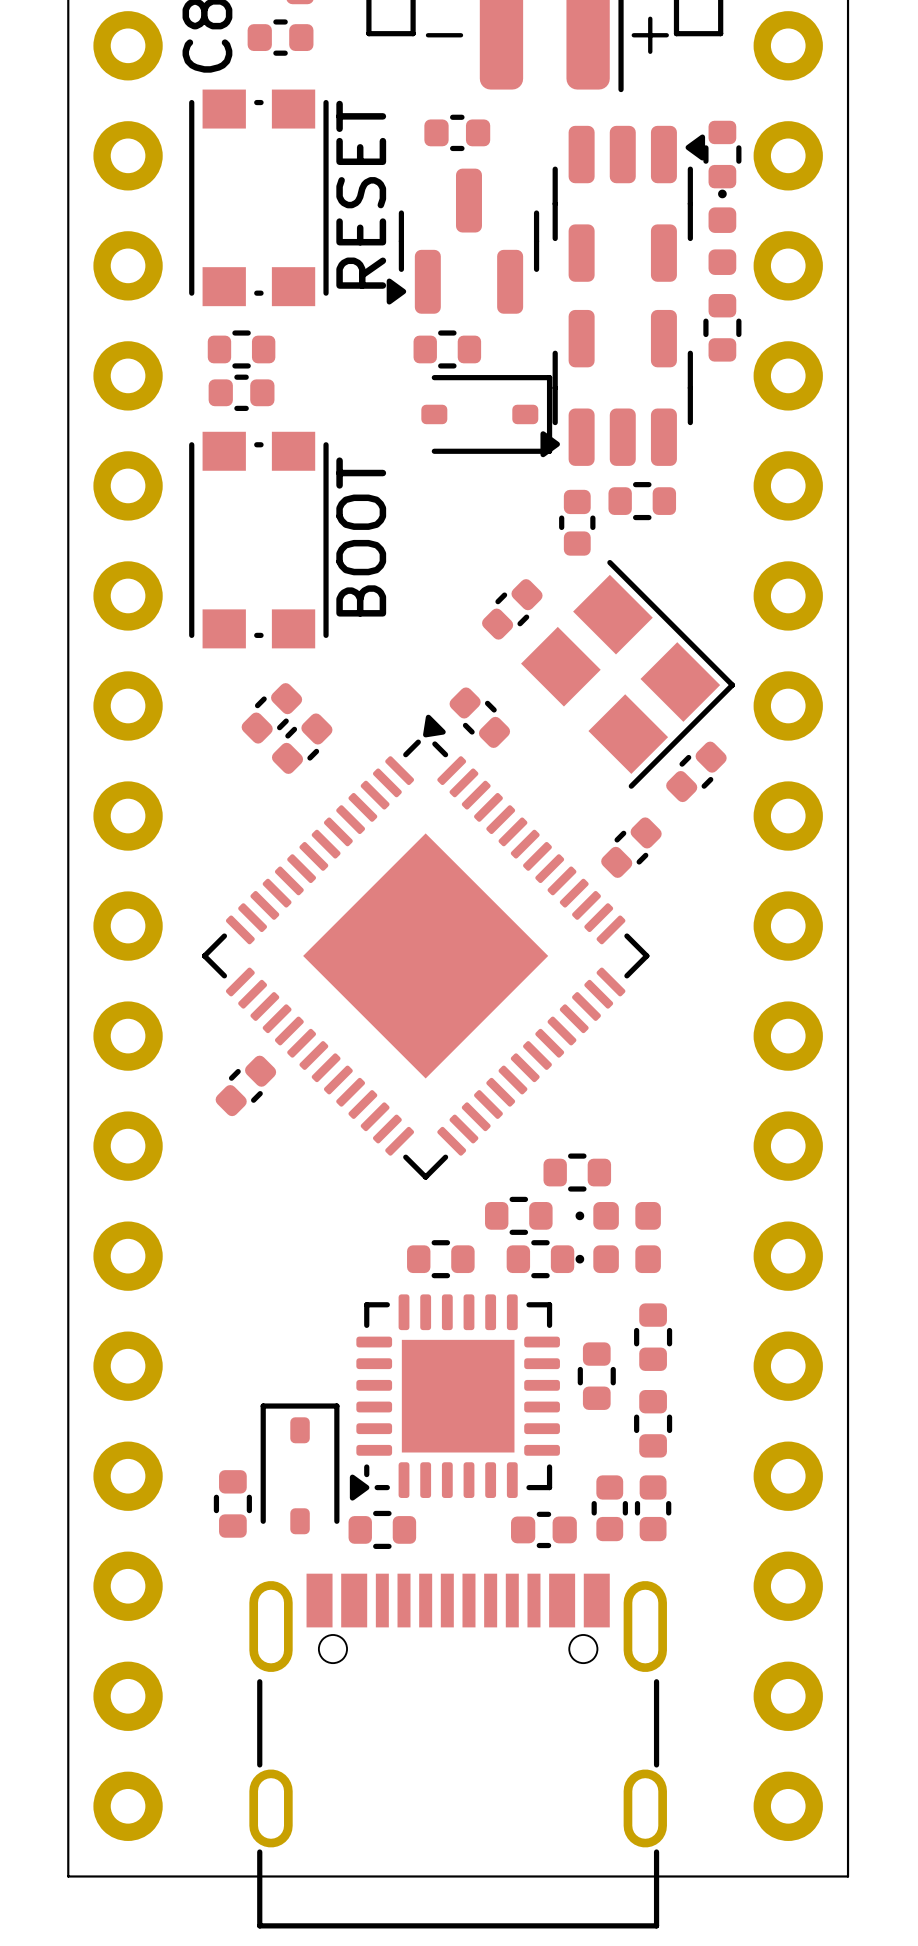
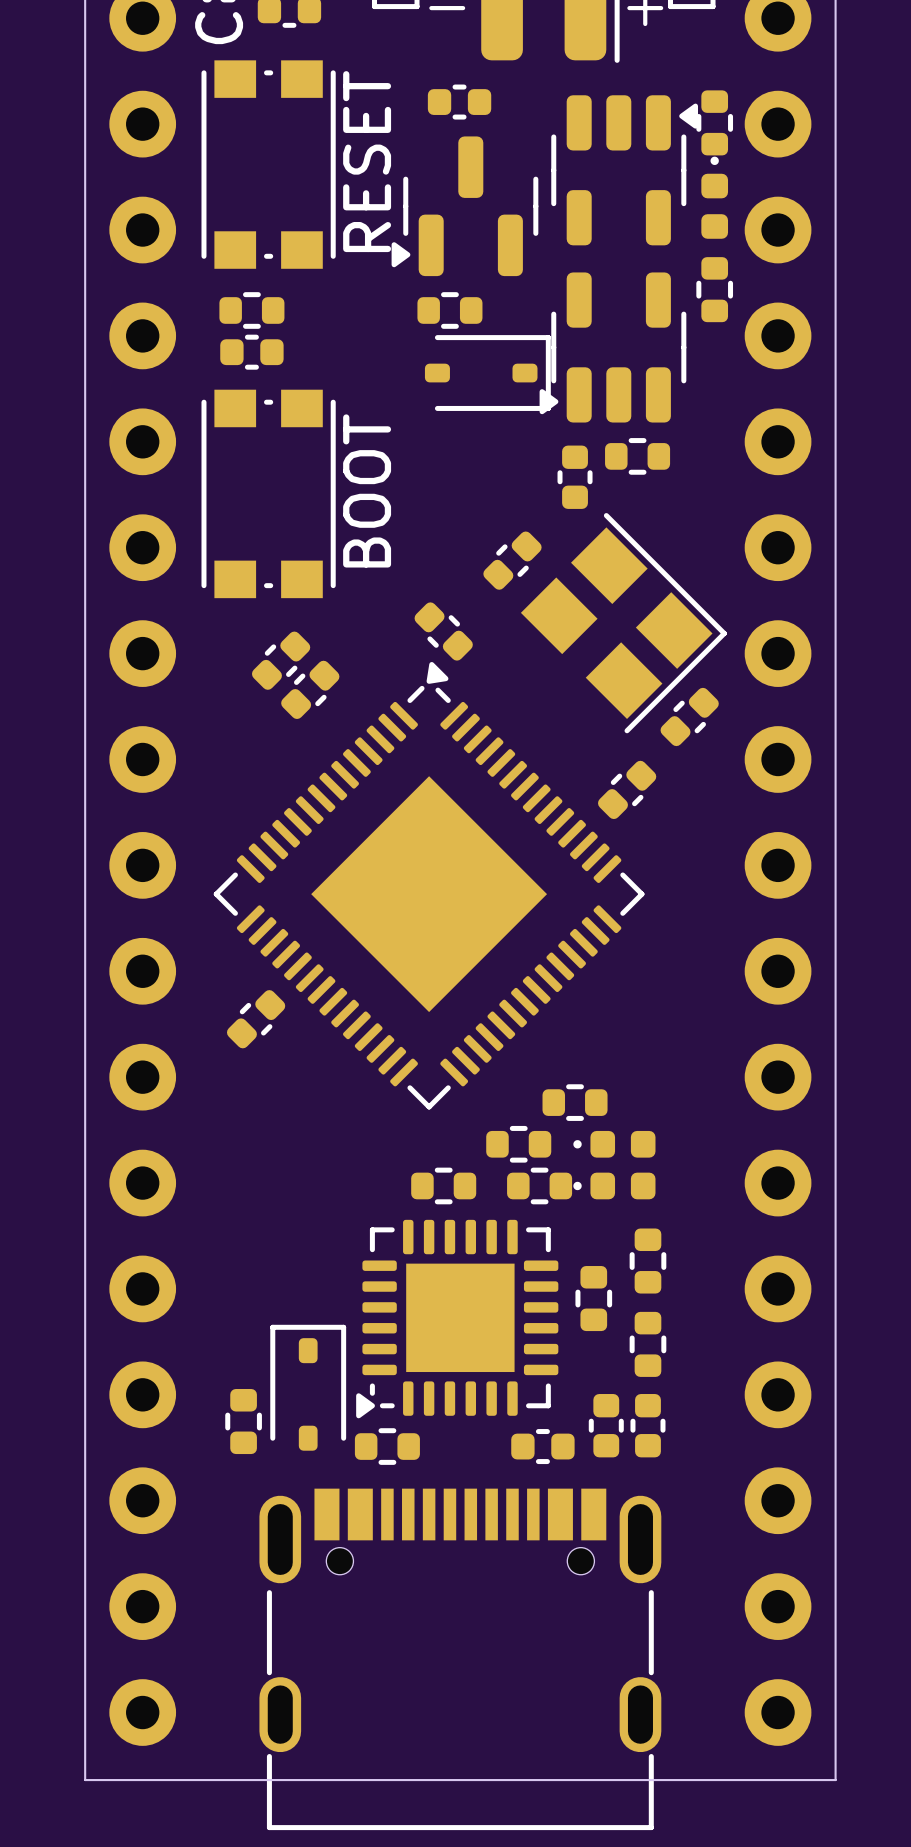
part position: (479, 717) -> (443, 631)

